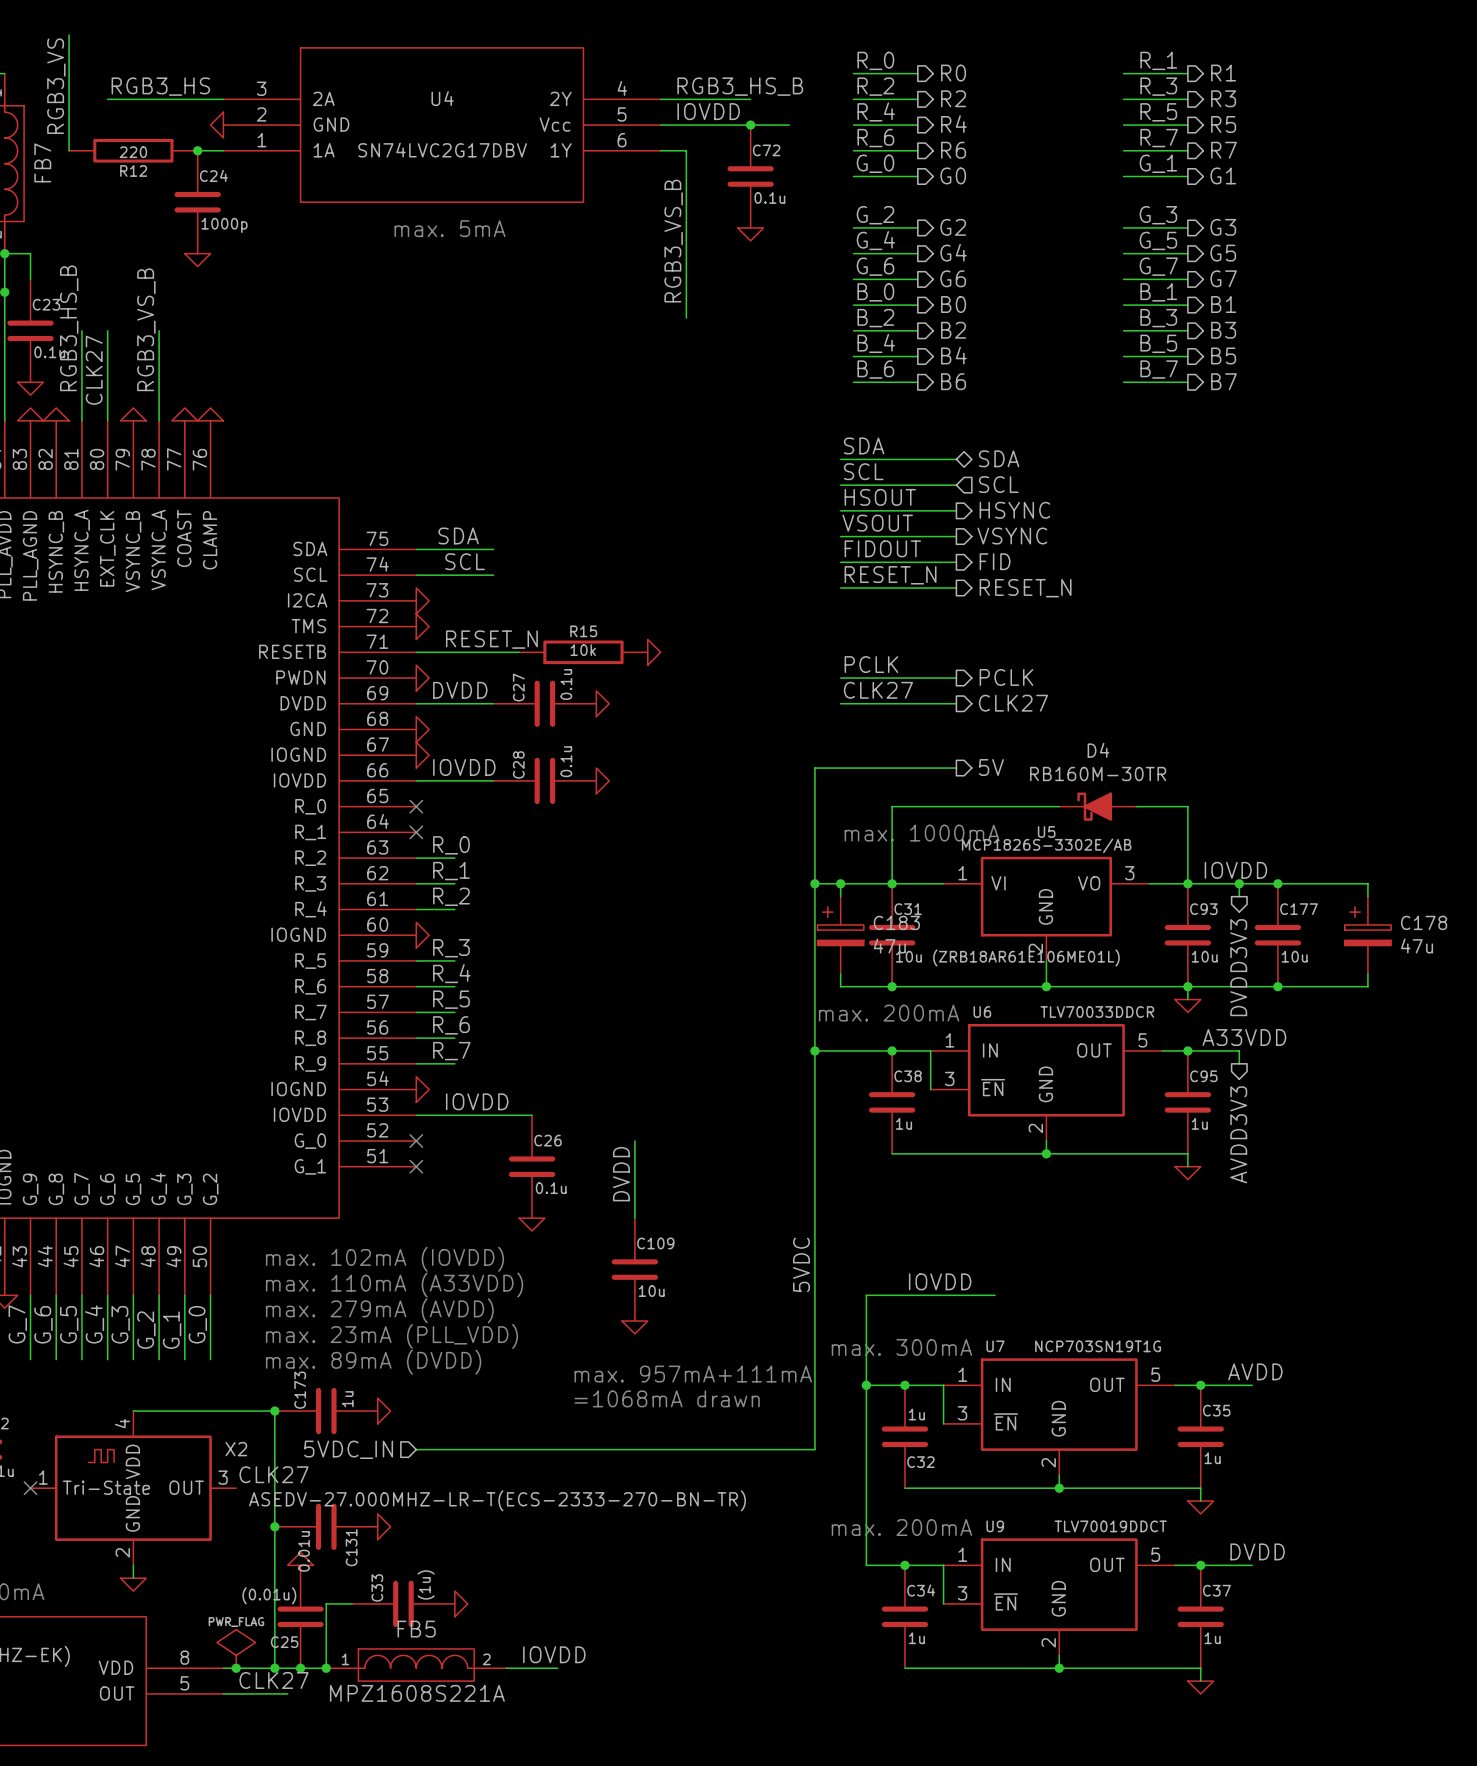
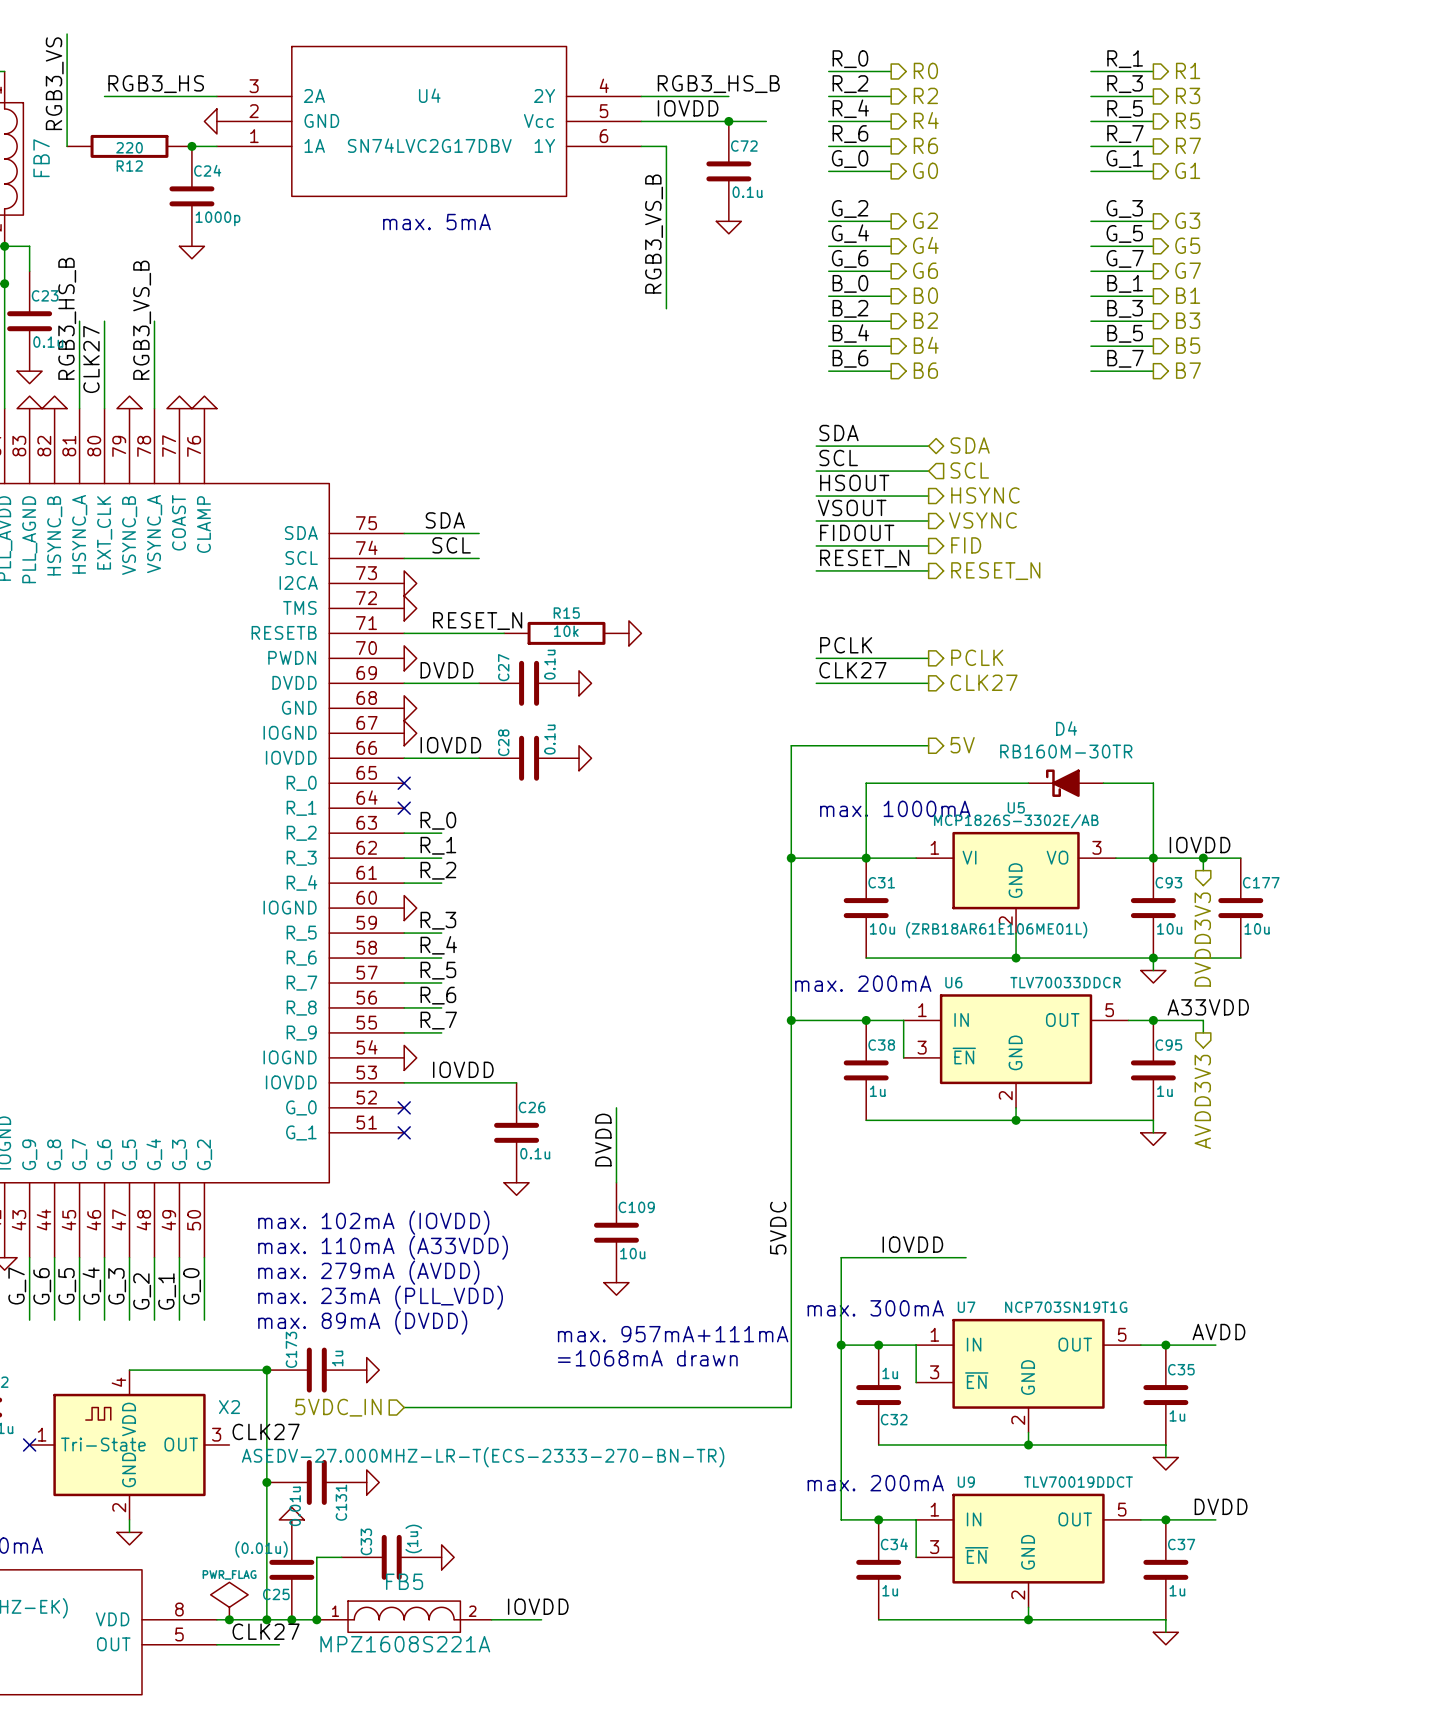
wire: (840, 883) (840, 896) -> none
junction: (840, 883) -> none
wire: (1277, 883) (1367, 883) (1367, 896) -> none
junction: (1277, 883) -> none
C183: 47u (840, 935) -> none
C178: 47u (1367, 935) -> none
wire: (840, 973) (840, 986) (892, 986) -> none
wire: (1367, 973) (1367, 986) (1277, 986) -> none
junction: (892, 986) -> none
junction: (1277, 986) -> none

